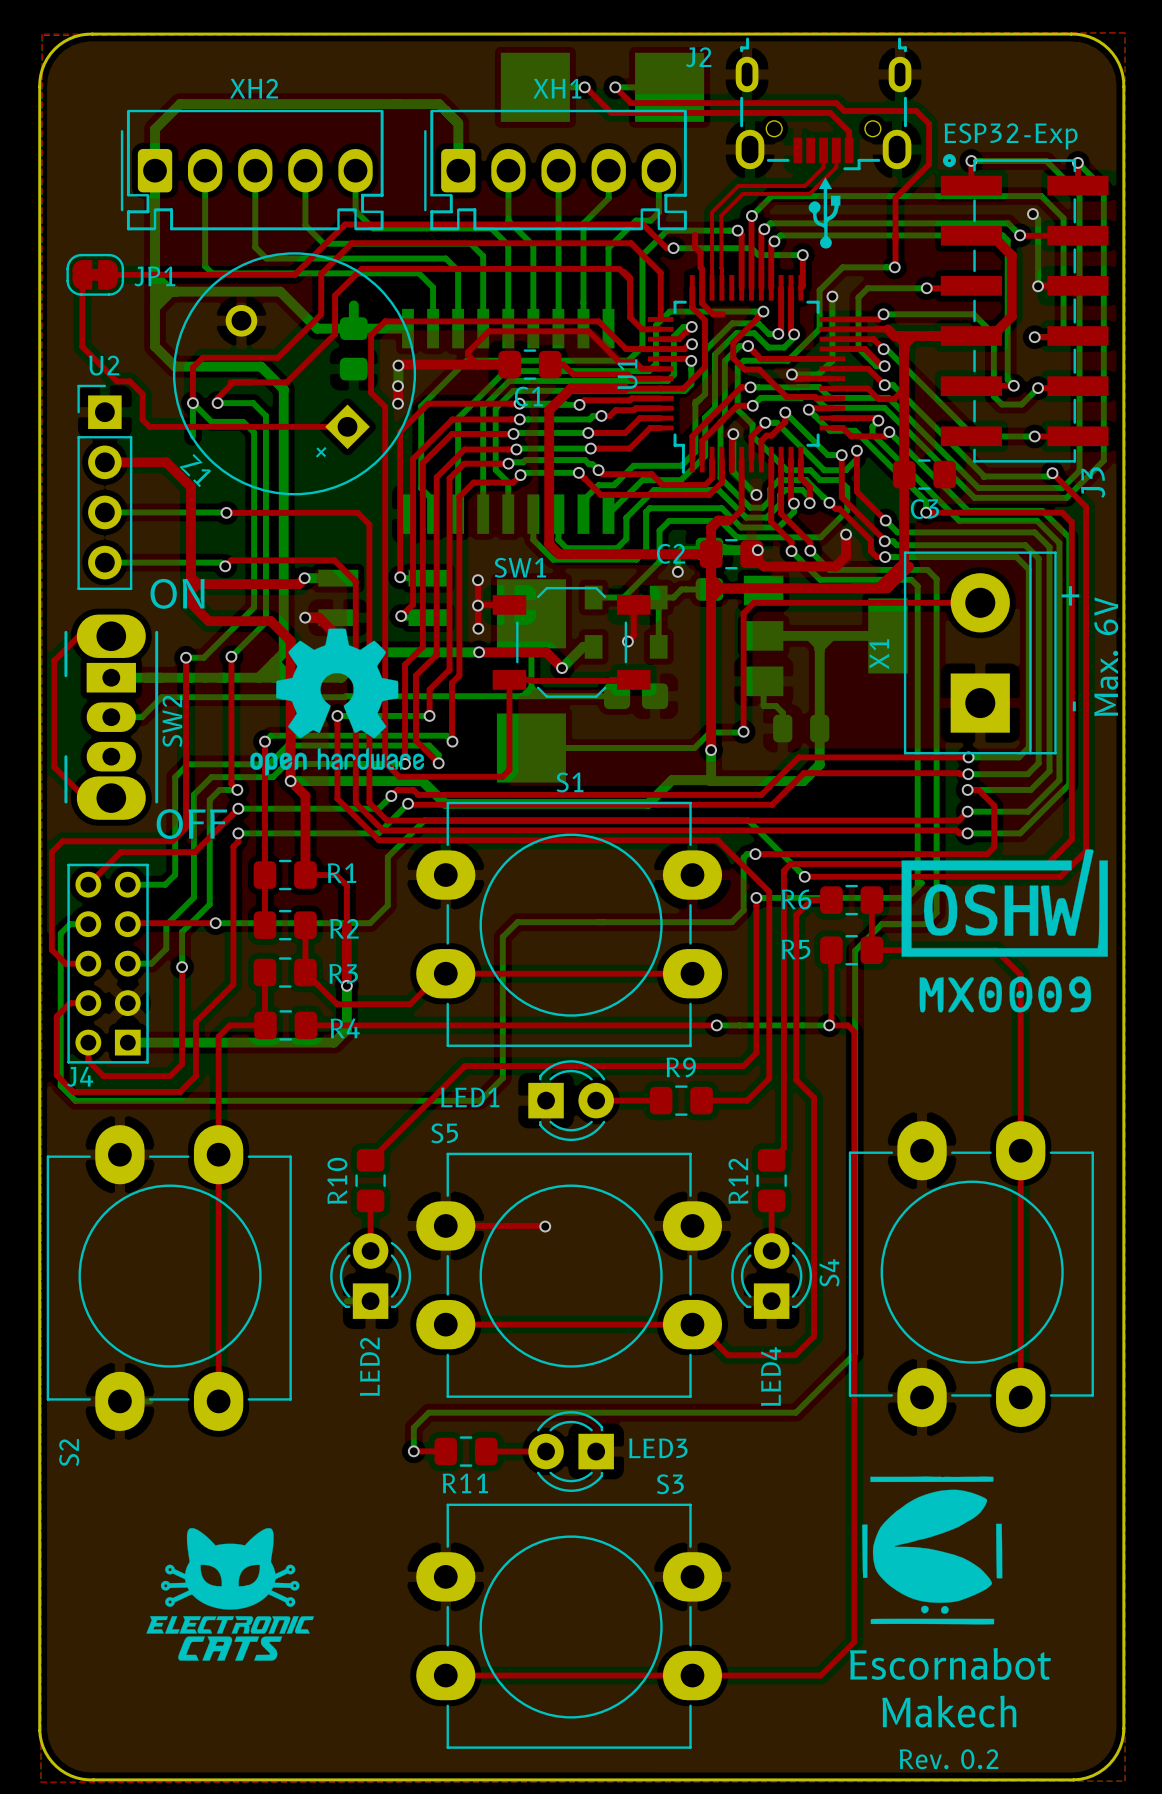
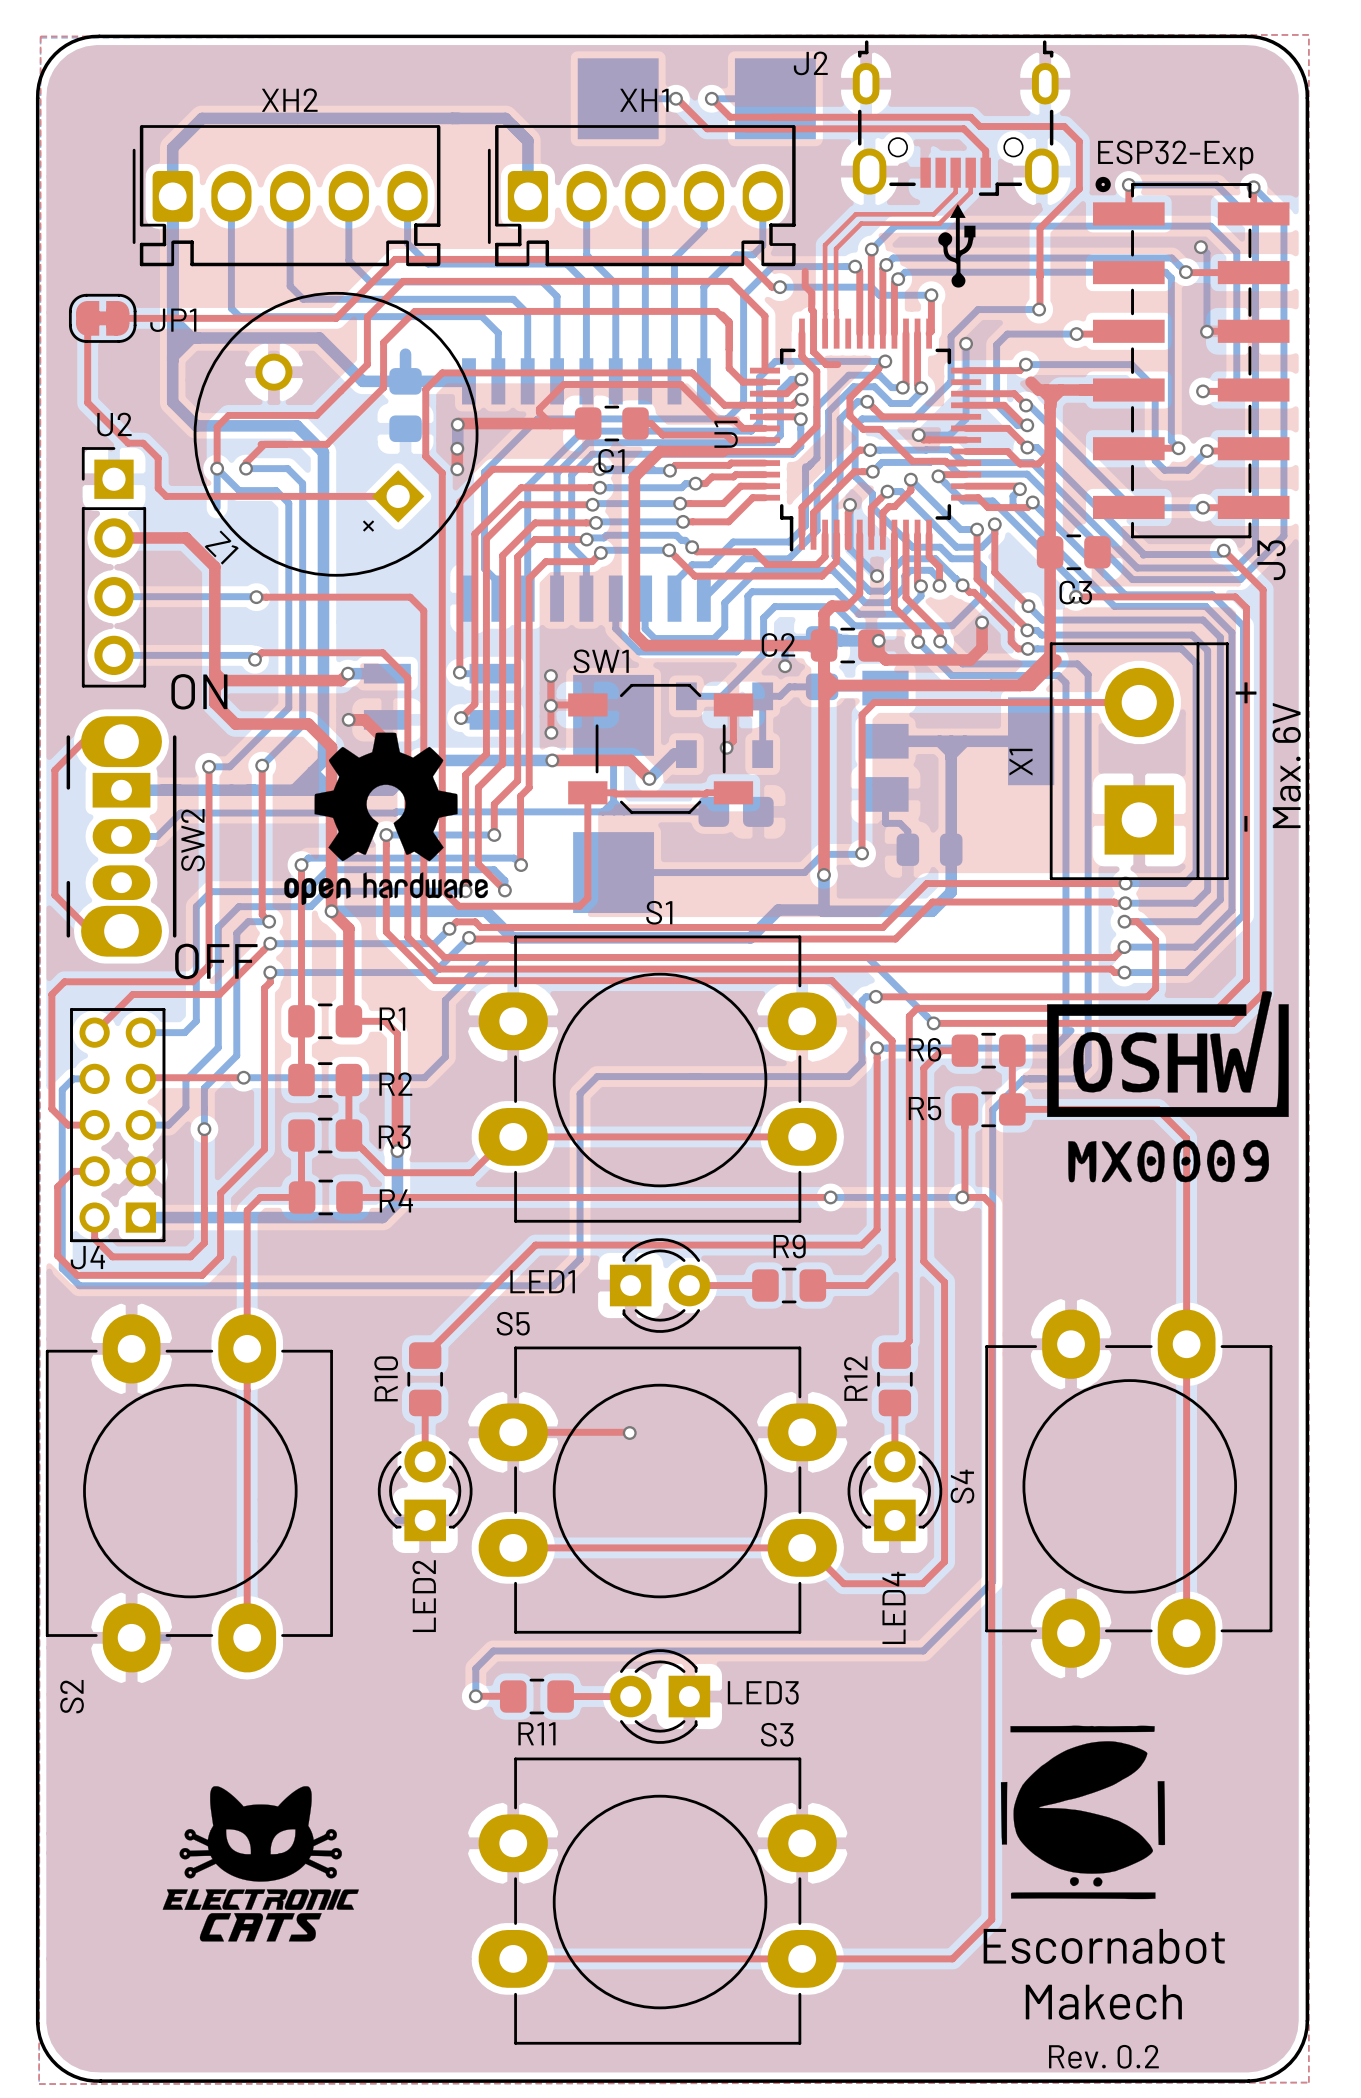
top track: (992, 235) (1011, 255) (1011, 316) (992, 336) -> none
top track: (832, 329) (887, 329) -> none

